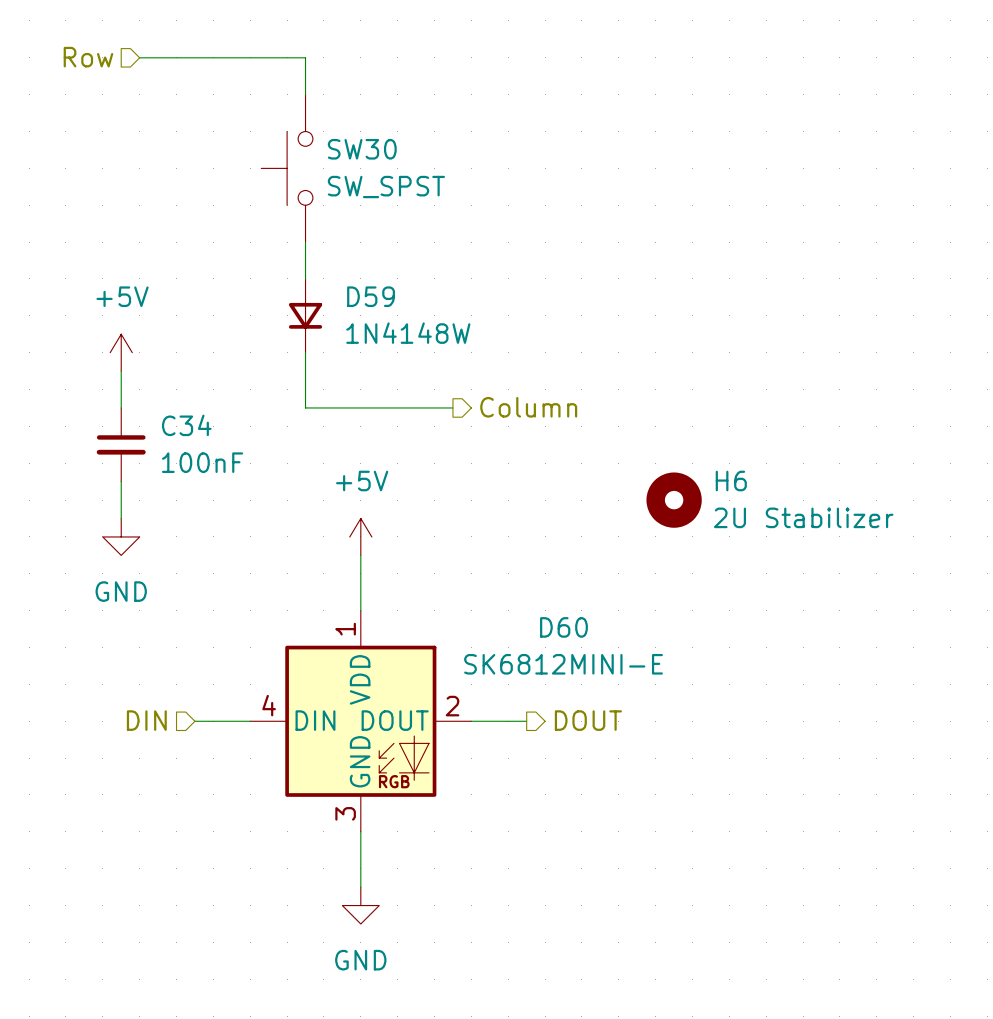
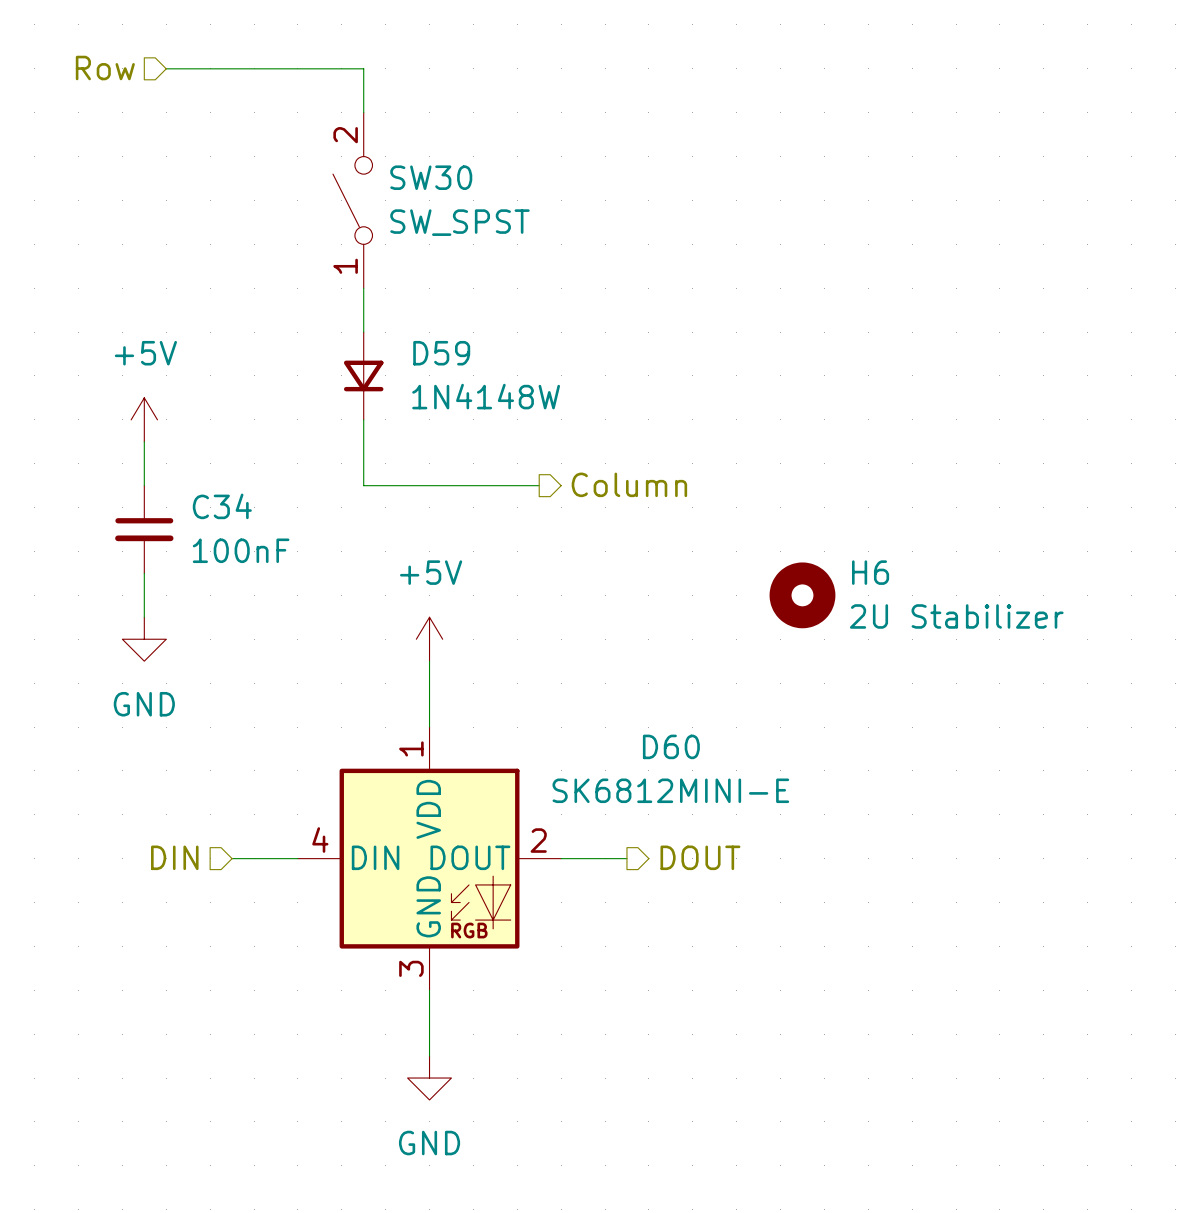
SW30 symbol: [261, 94, 313, 243] -> [332, 112, 373, 289]

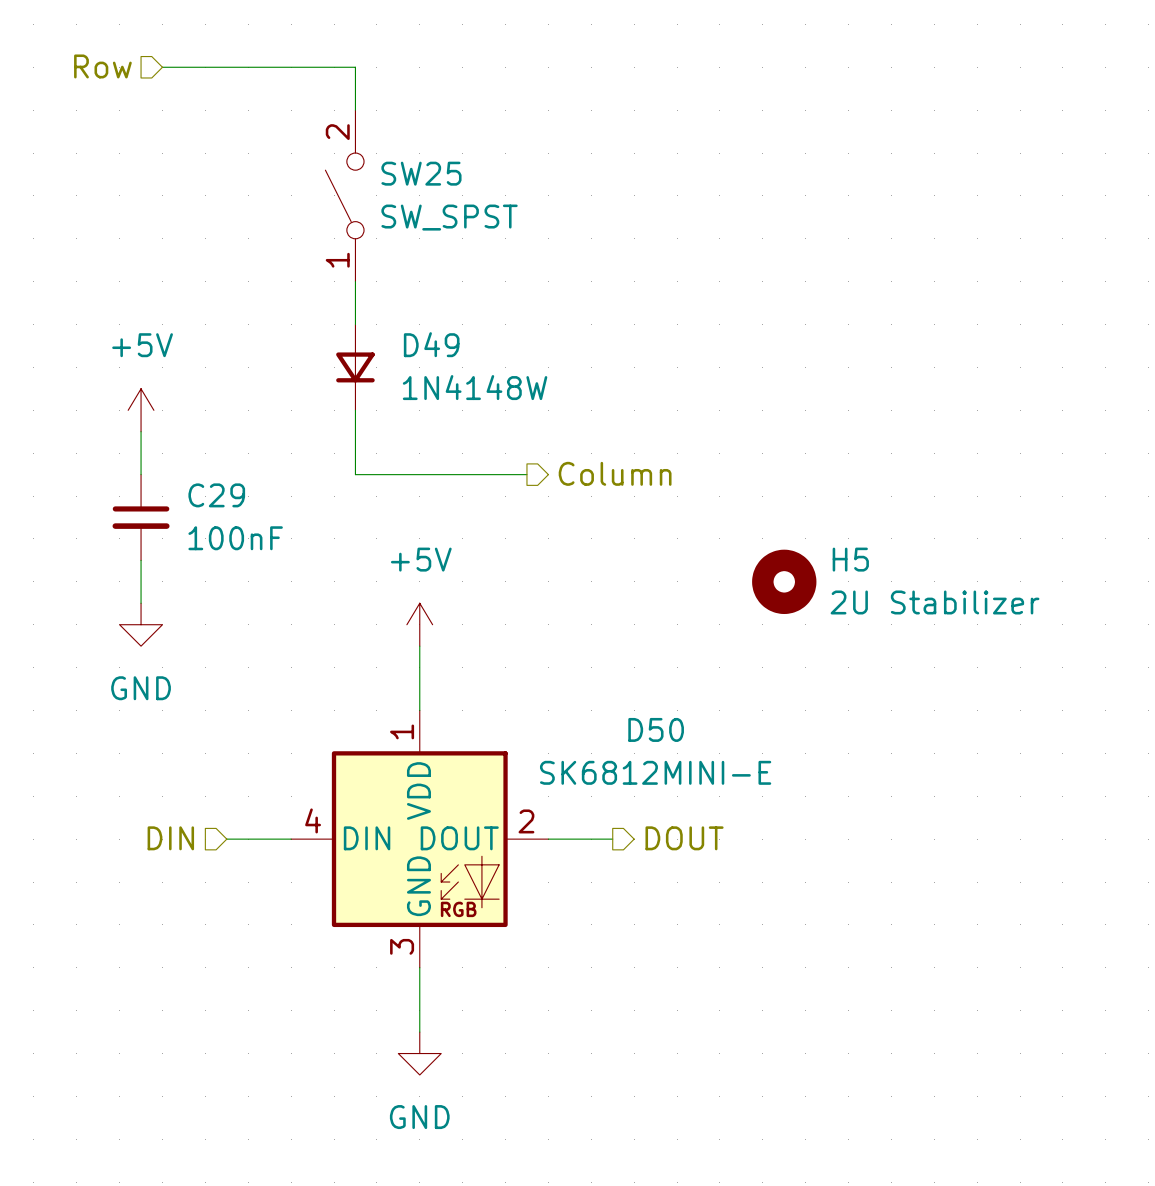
SW30 name: SW30 (431, 177) -> SW25 (421, 173)
D59 name: D59 (441, 353) -> D49 (431, 344)
C34 name: C34 (222, 506) -> C29 (216, 495)
H6 name: H6 (870, 572) -> H5 (850, 559)
D60 name: D60 (671, 746) -> D50 (656, 729)

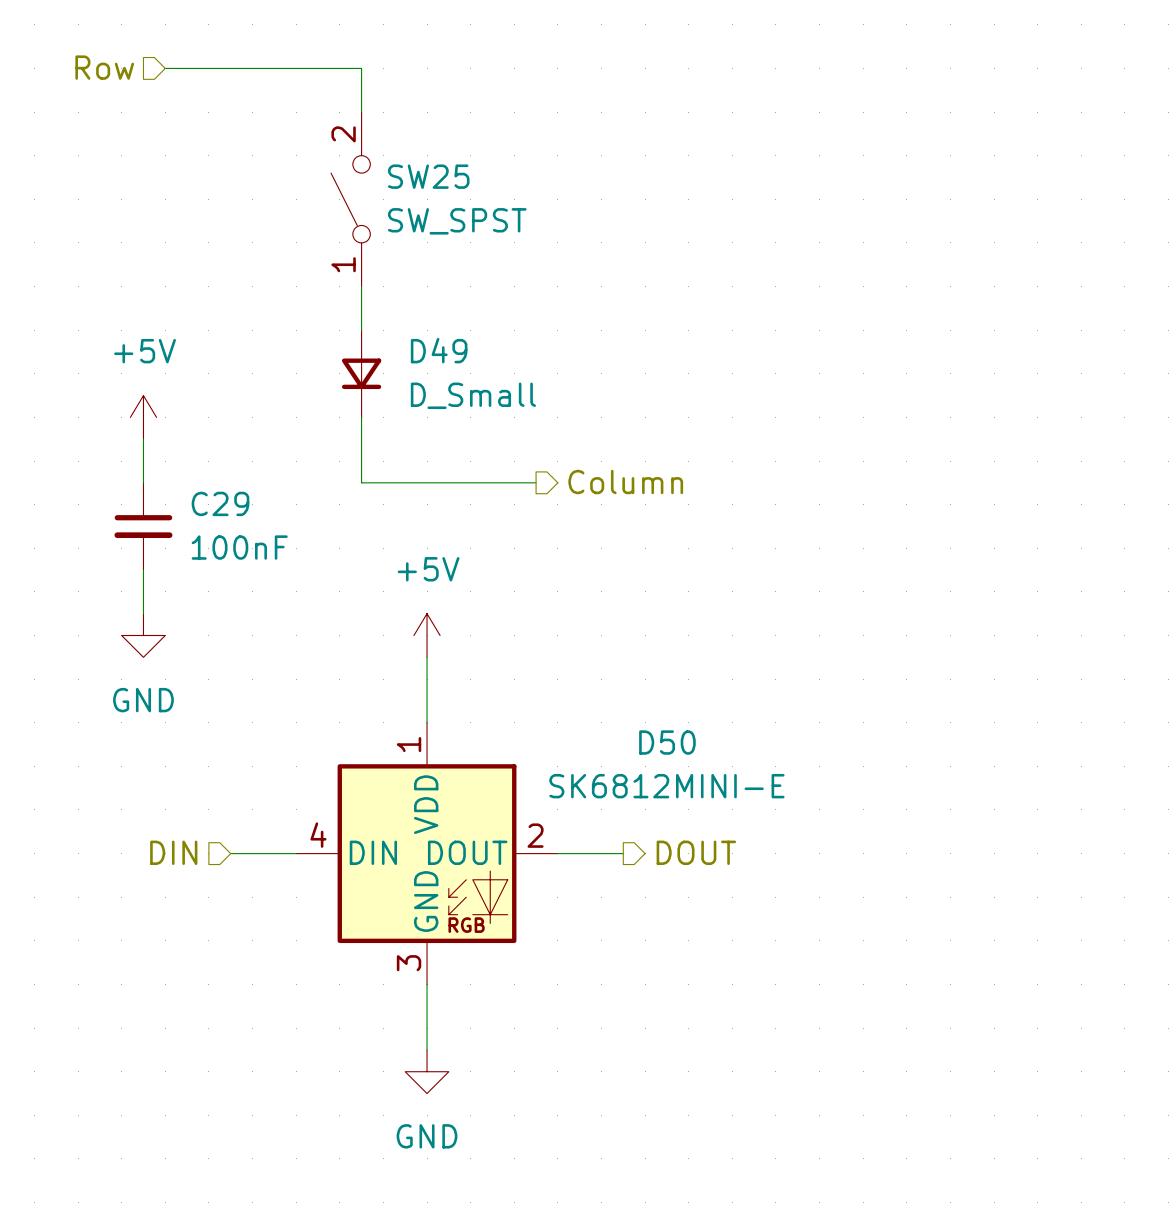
D49 value: 1N4148W (475, 387) -> D_Small (473, 395)
H5: 2U Stabilizer (784, 581) -> none

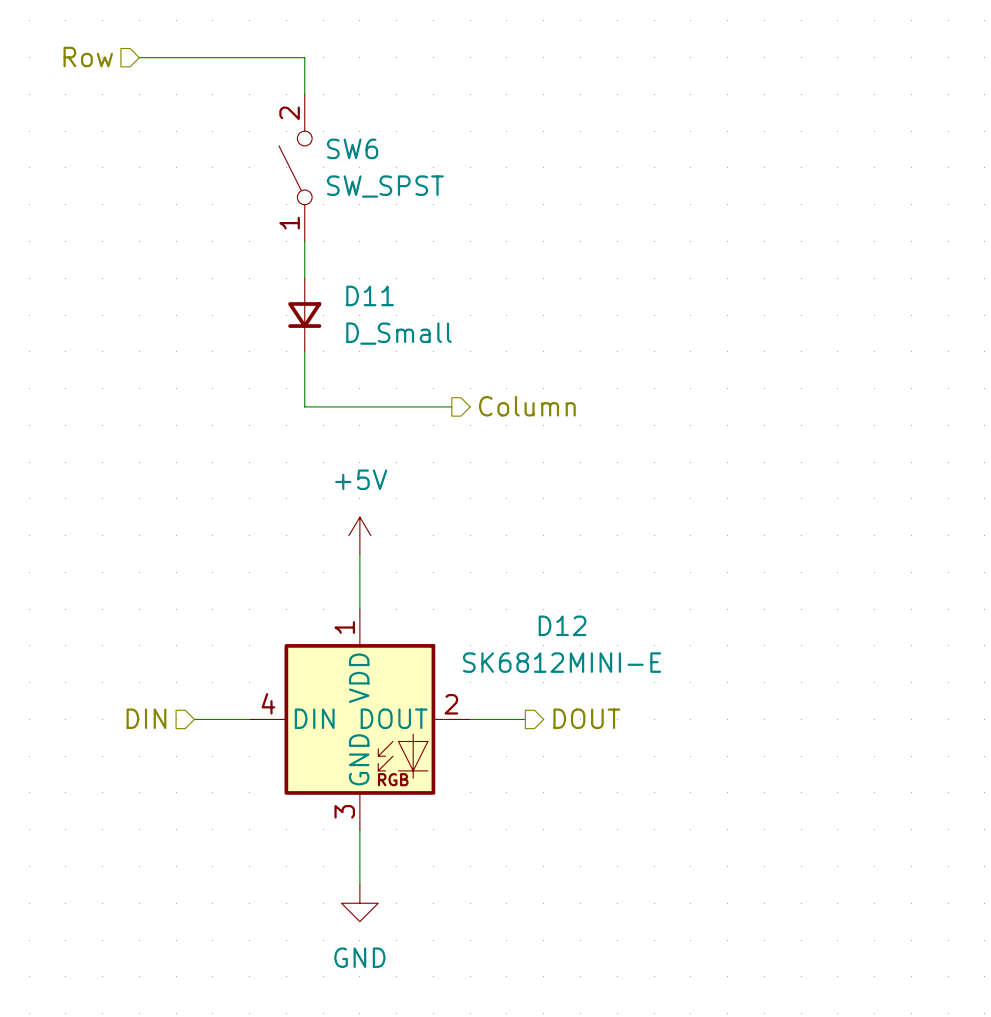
SW25 name: SW25 (428, 176) -> SW6 (352, 148)
D49 name: D49 (439, 350) -> D11 (370, 295)
power symbol: +5V (143, 417) -> none
wire: (143, 439) (143, 482) -> none
C29: 100nF (143, 526) -> none
wire: (143, 570) (143, 613) -> none
power symbol: GND (143, 635) -> none
D50 name: D50 (667, 742) -> D12 (562, 625)

